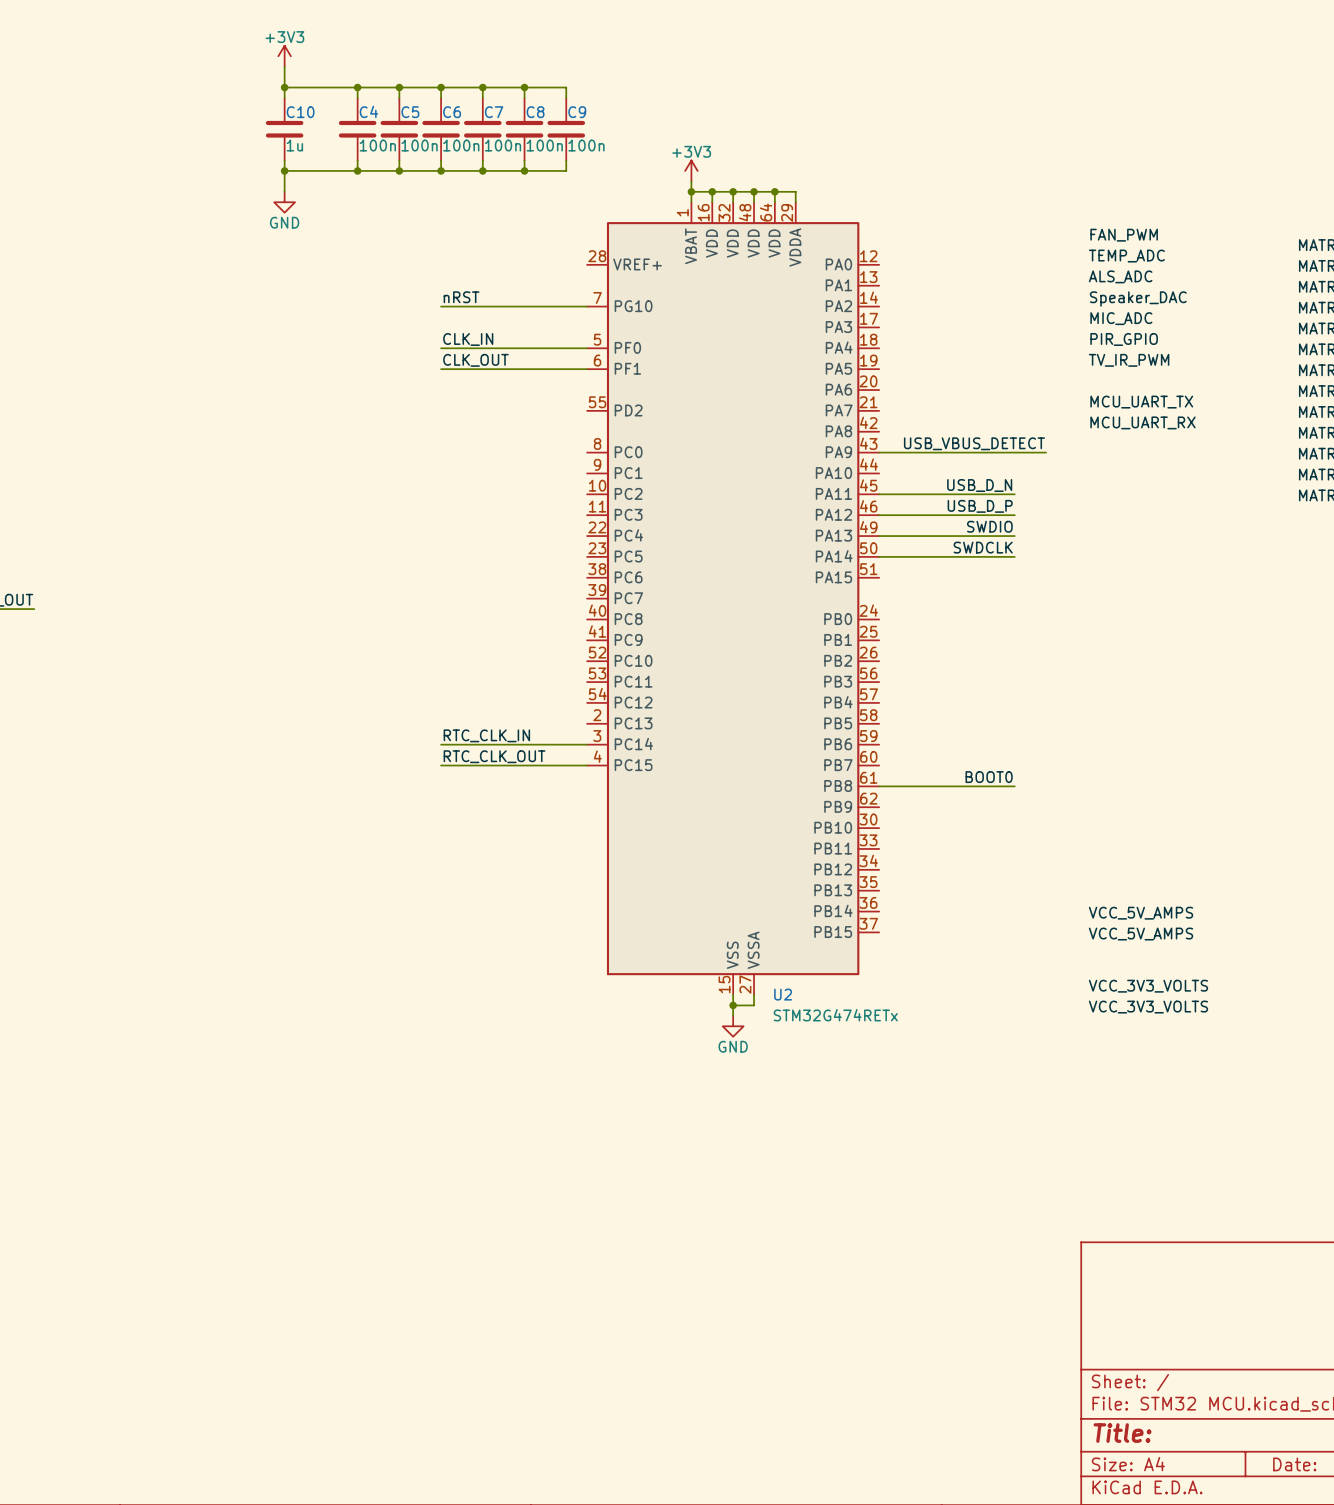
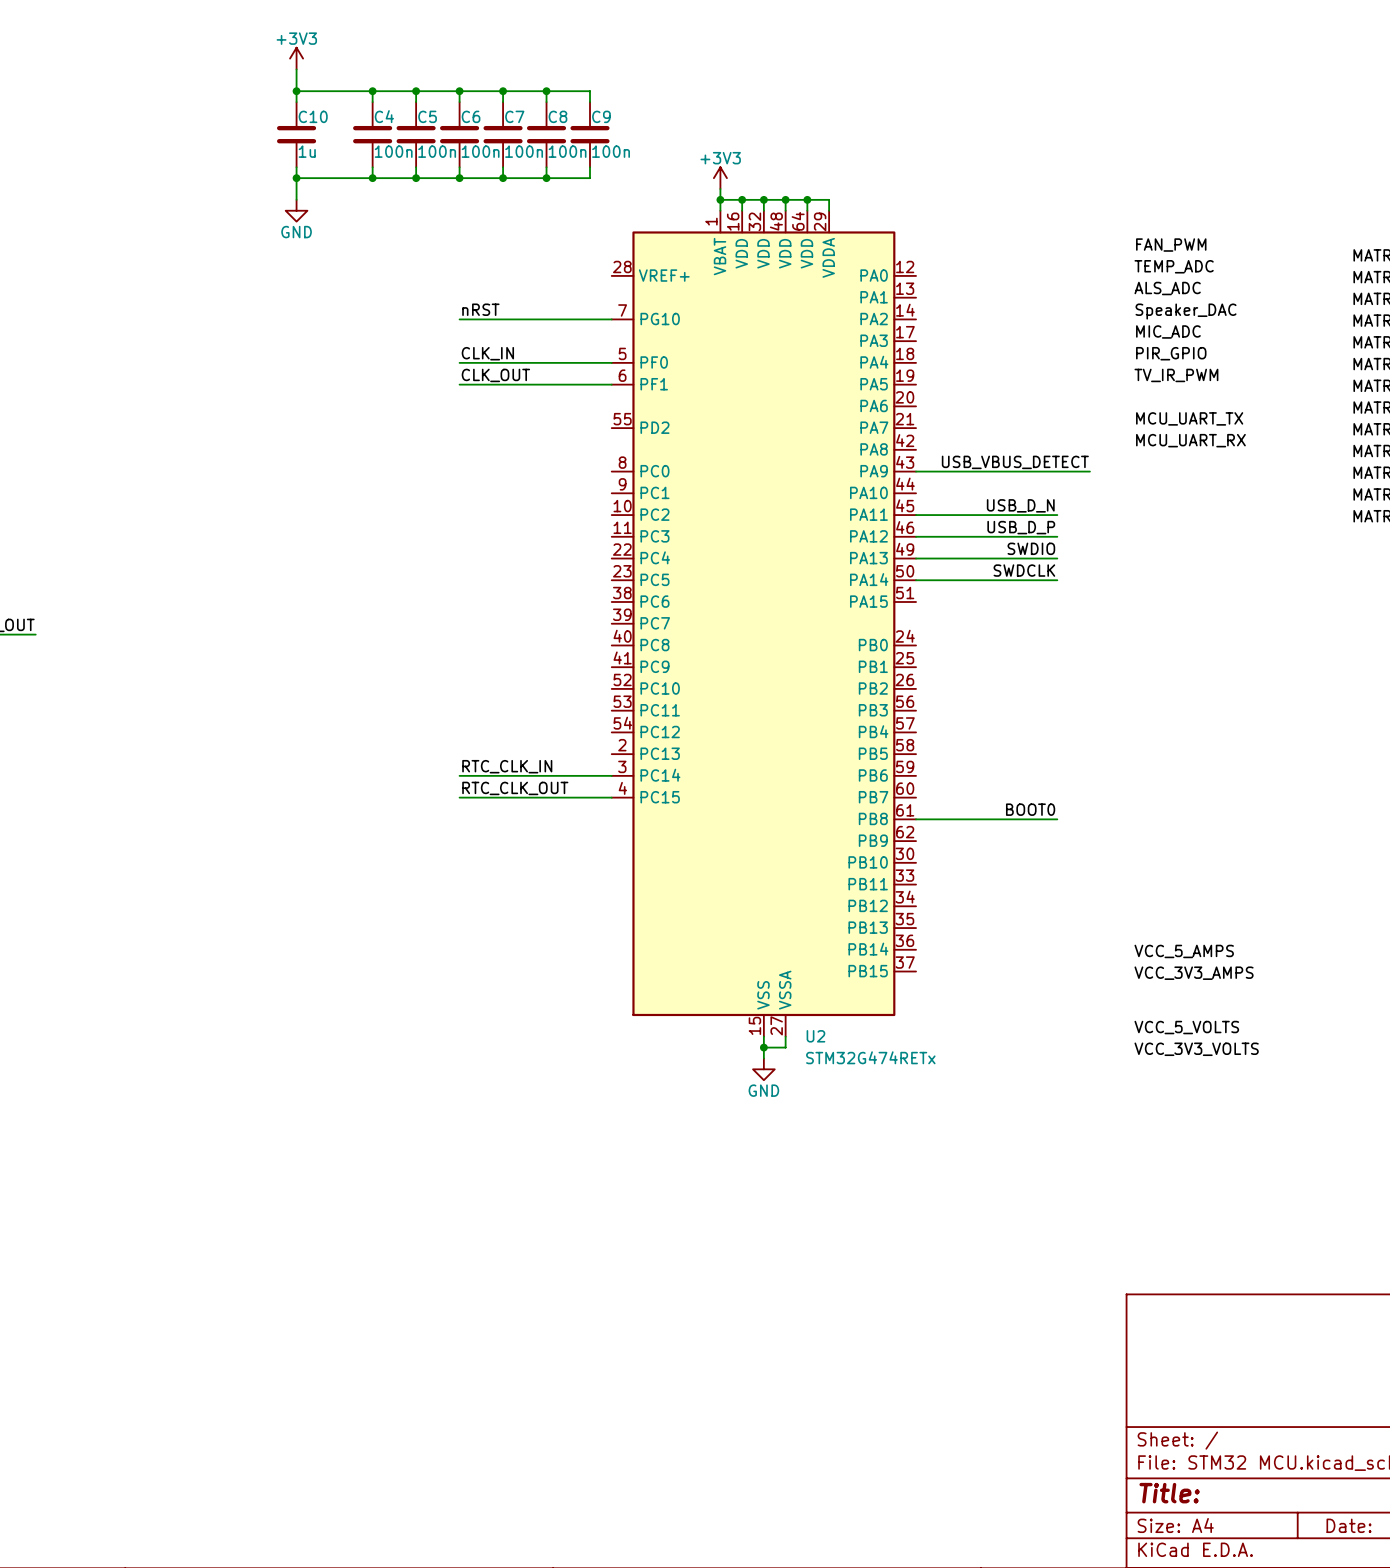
label: VCC_5V_AMPS (1141, 913) -> VCC_5_AMPS (1184, 951)
label: VCC_5V_AMPS (1141, 934) -> VCC_3V3_AMPS (1194, 973)
label: VCC_3V3_VOLTS (1148, 986) -> VCC_5_VOLTS (1186, 1027)

